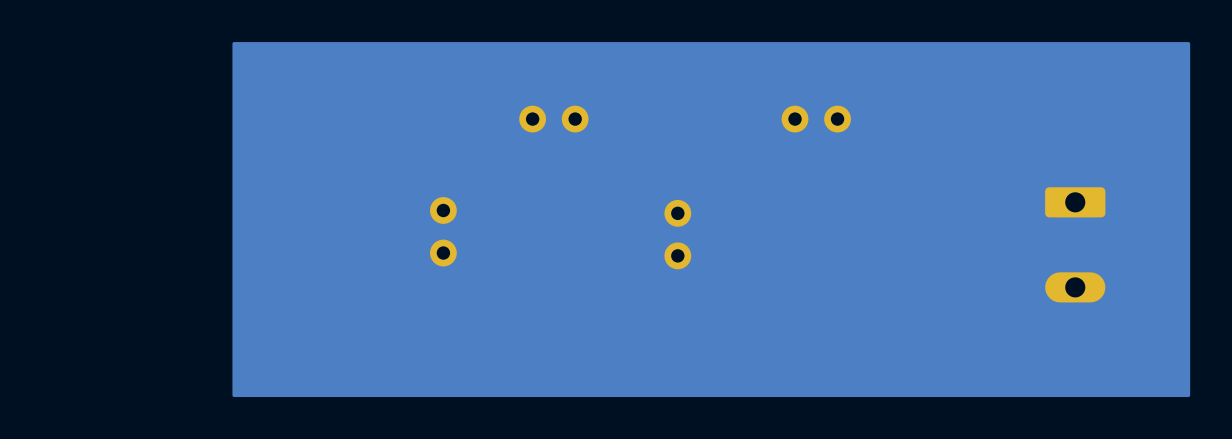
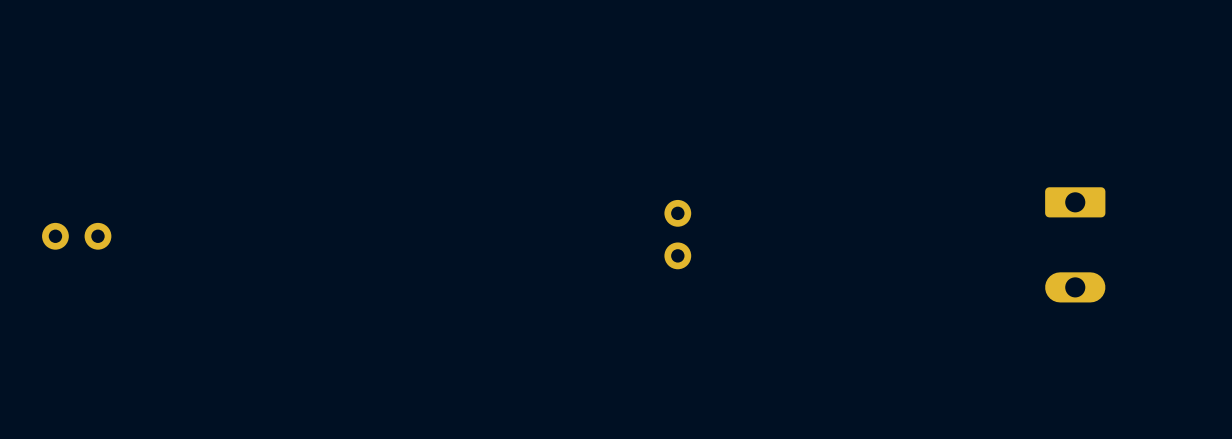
drawing: [232, 42, 1191, 398] -> none
part: (553, 119) -> none
part: (816, 119) -> none
part: (443, 231) -> none
part: none -> (76, 236)

